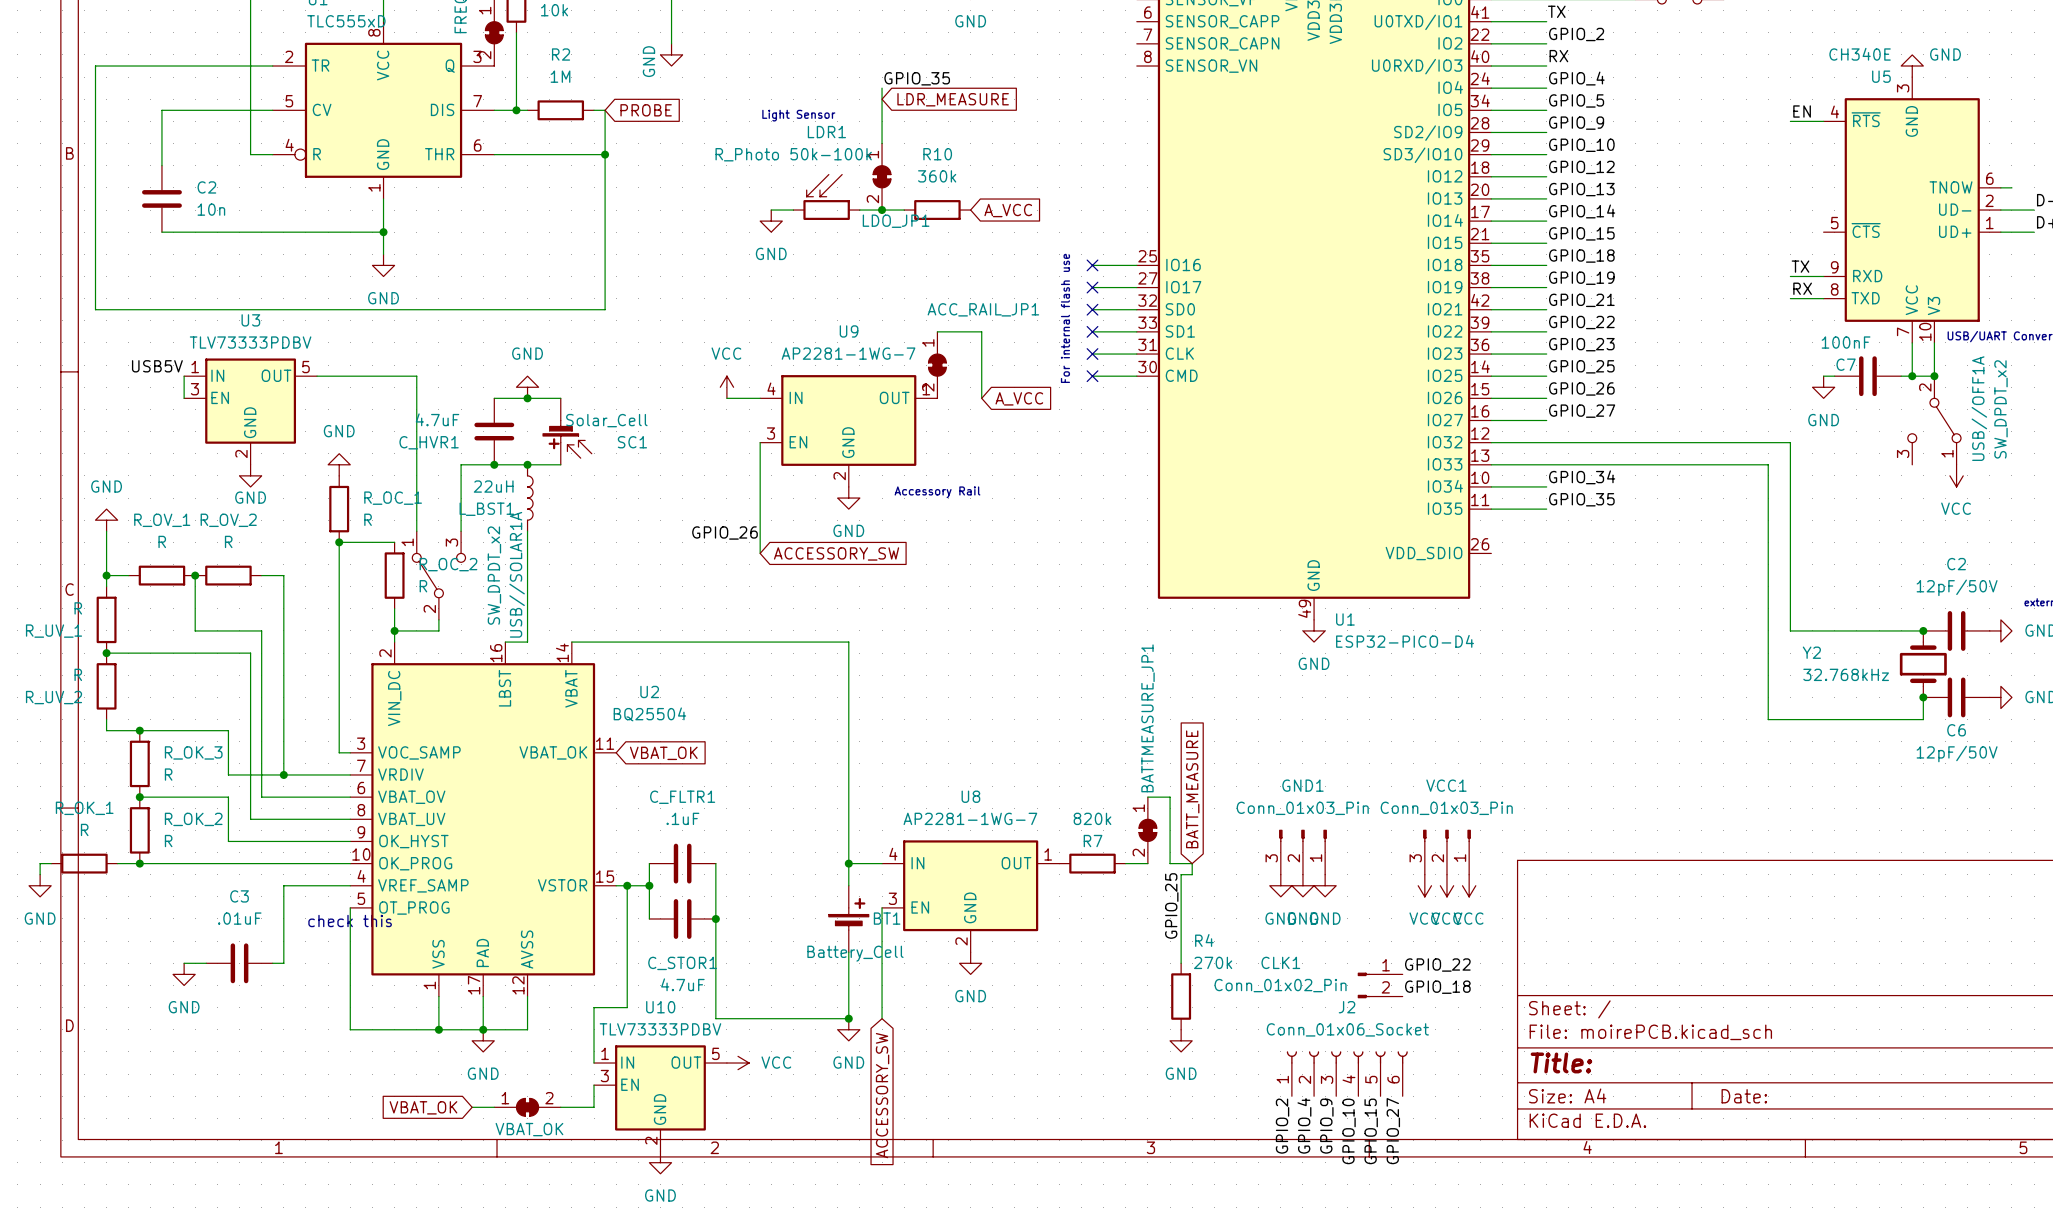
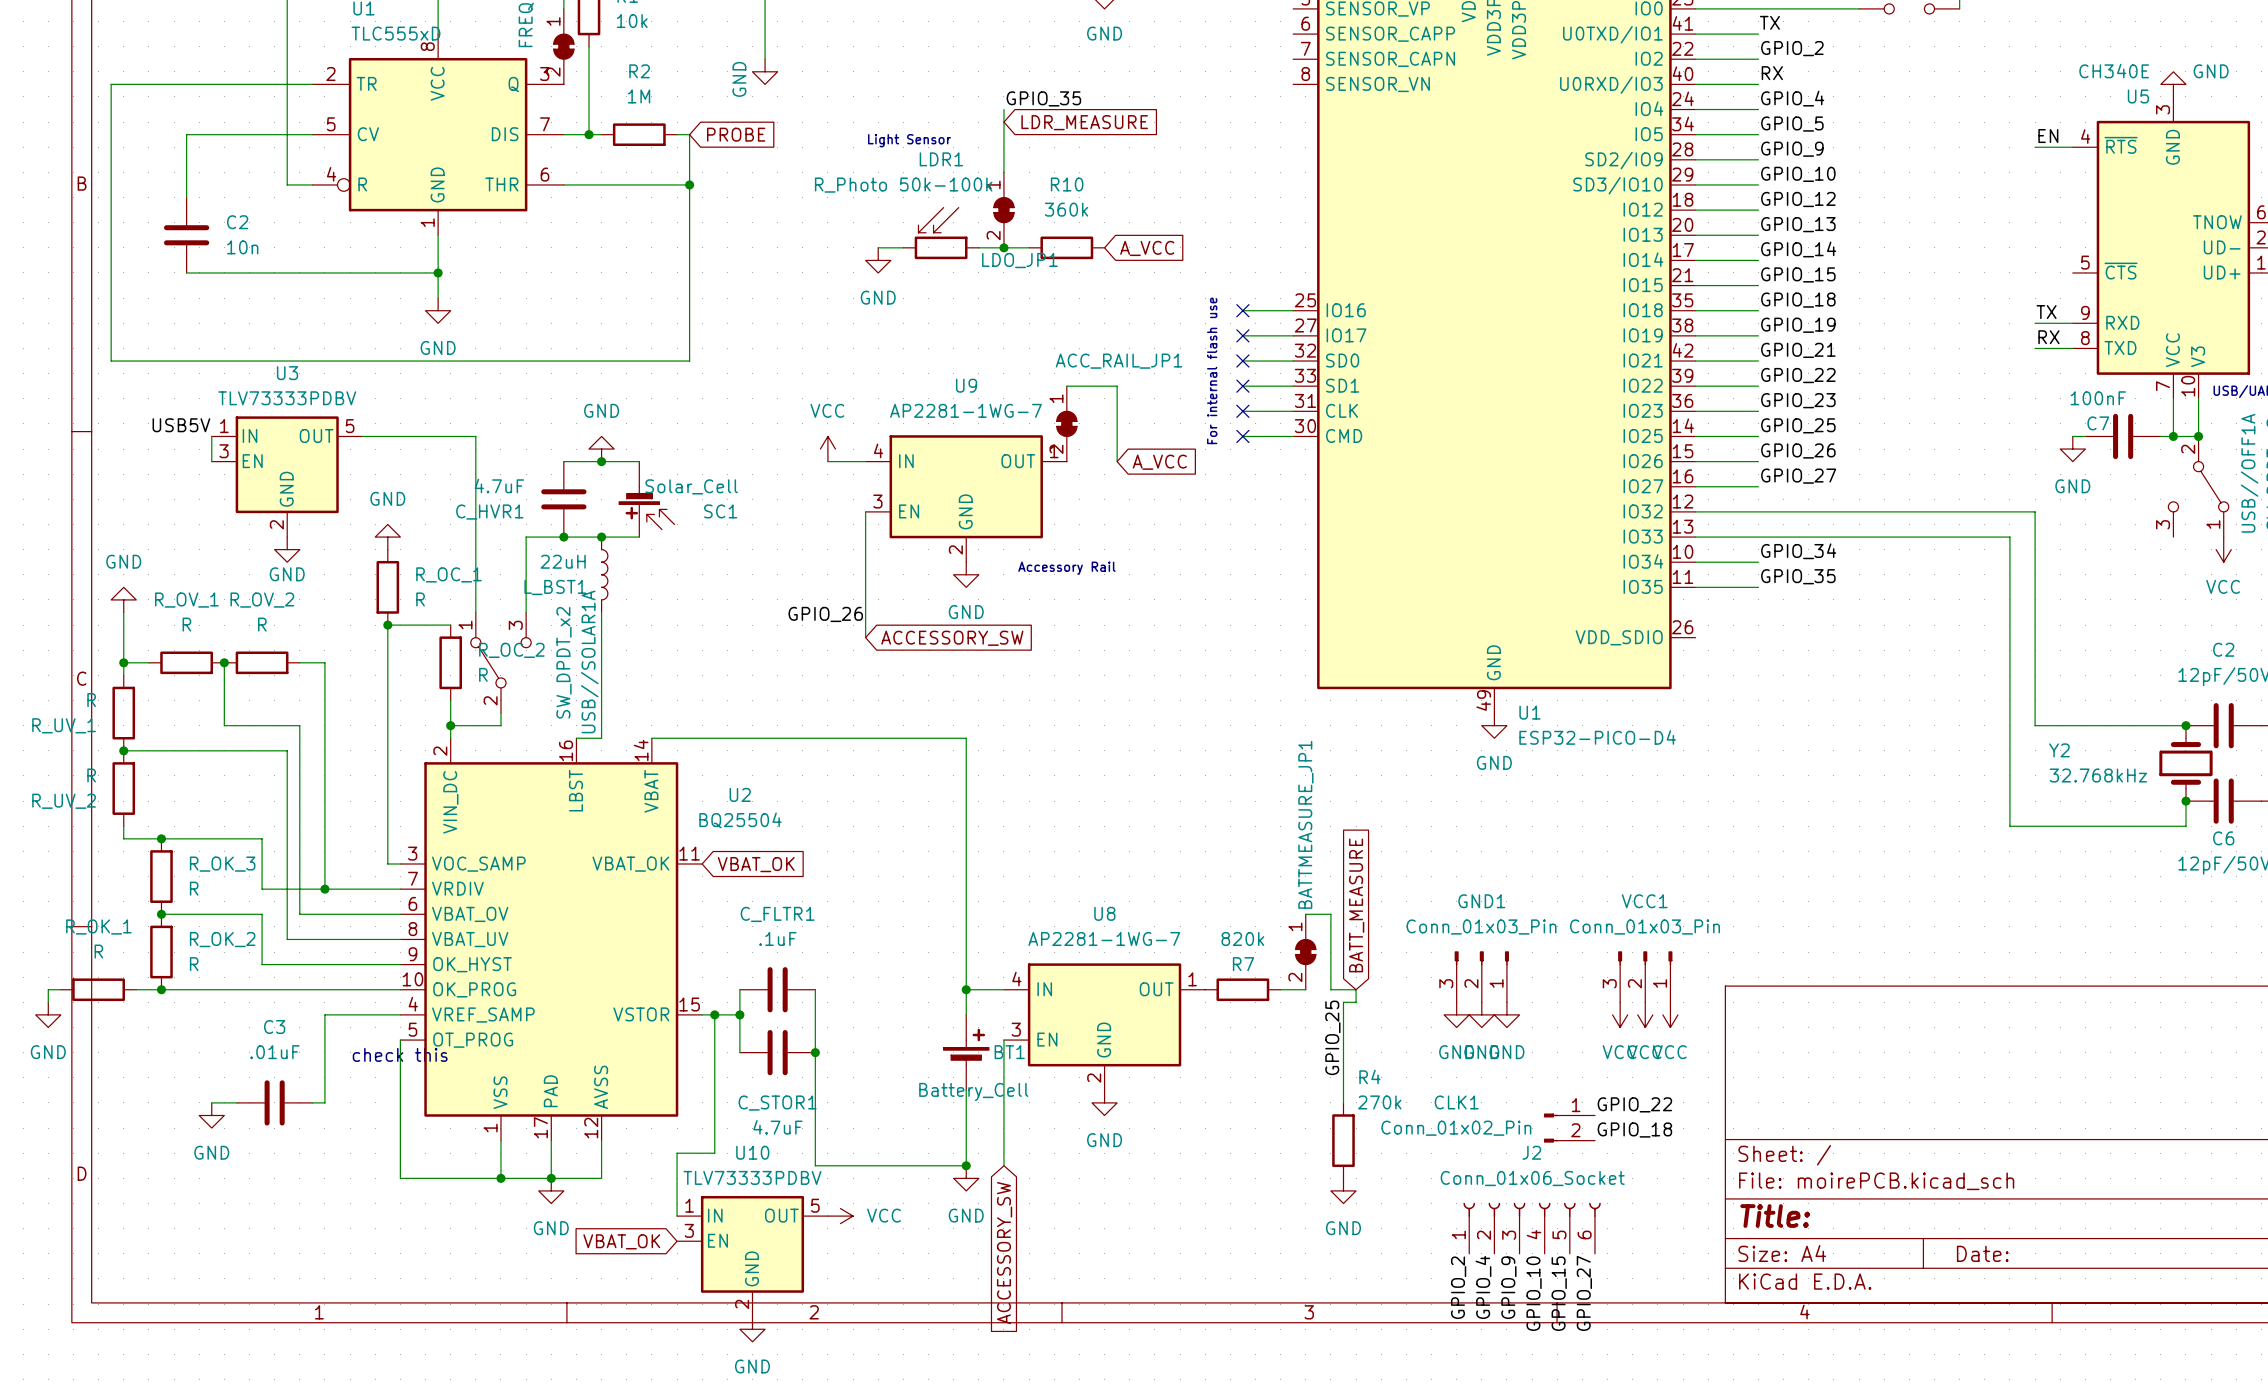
wire: (594, 1085) (594, 1107) (560, 1107) -> none
global label position: VBAT_OK (423, 1107) -> VBAT_OK (621, 1241)
wire: (472, 1107) (494, 1107) -> none
VBAT_OK: (527, 1107) -> none

